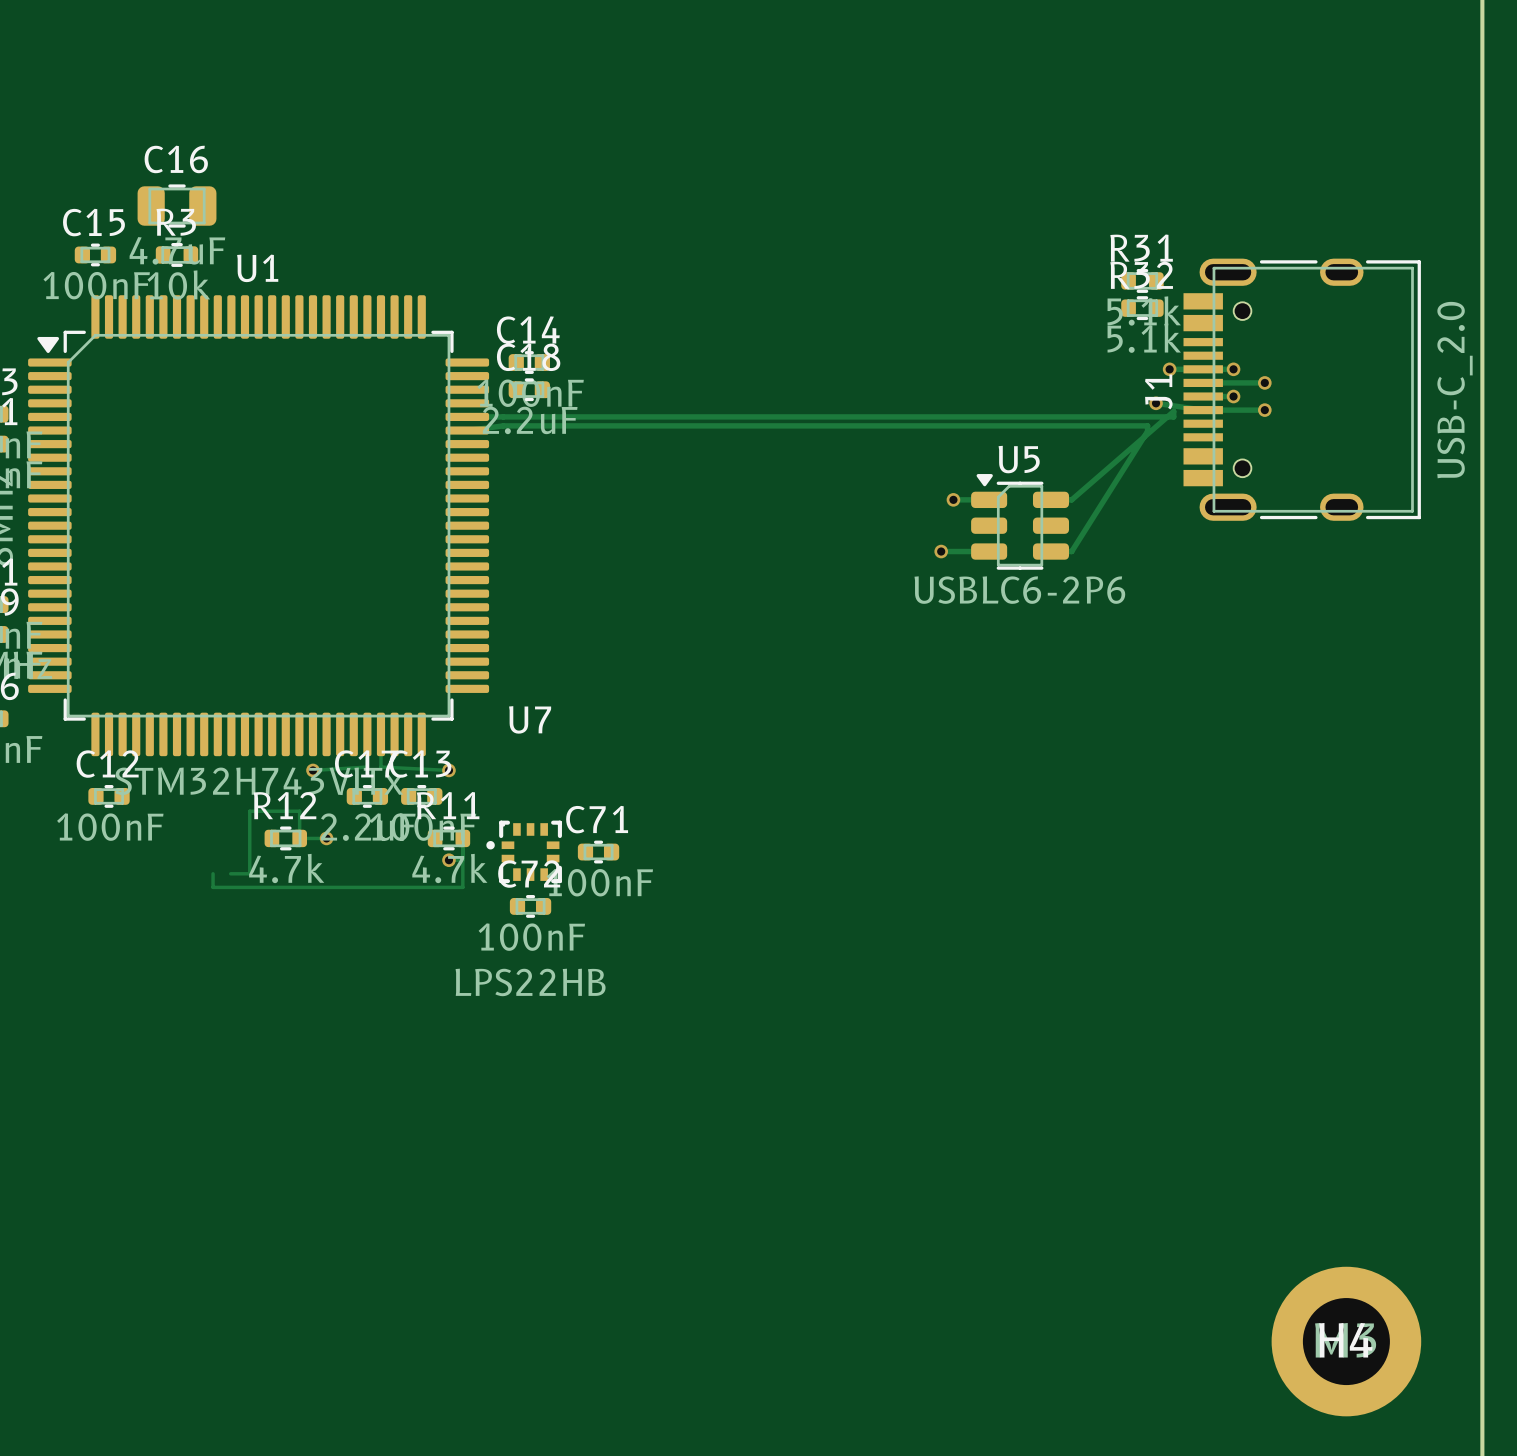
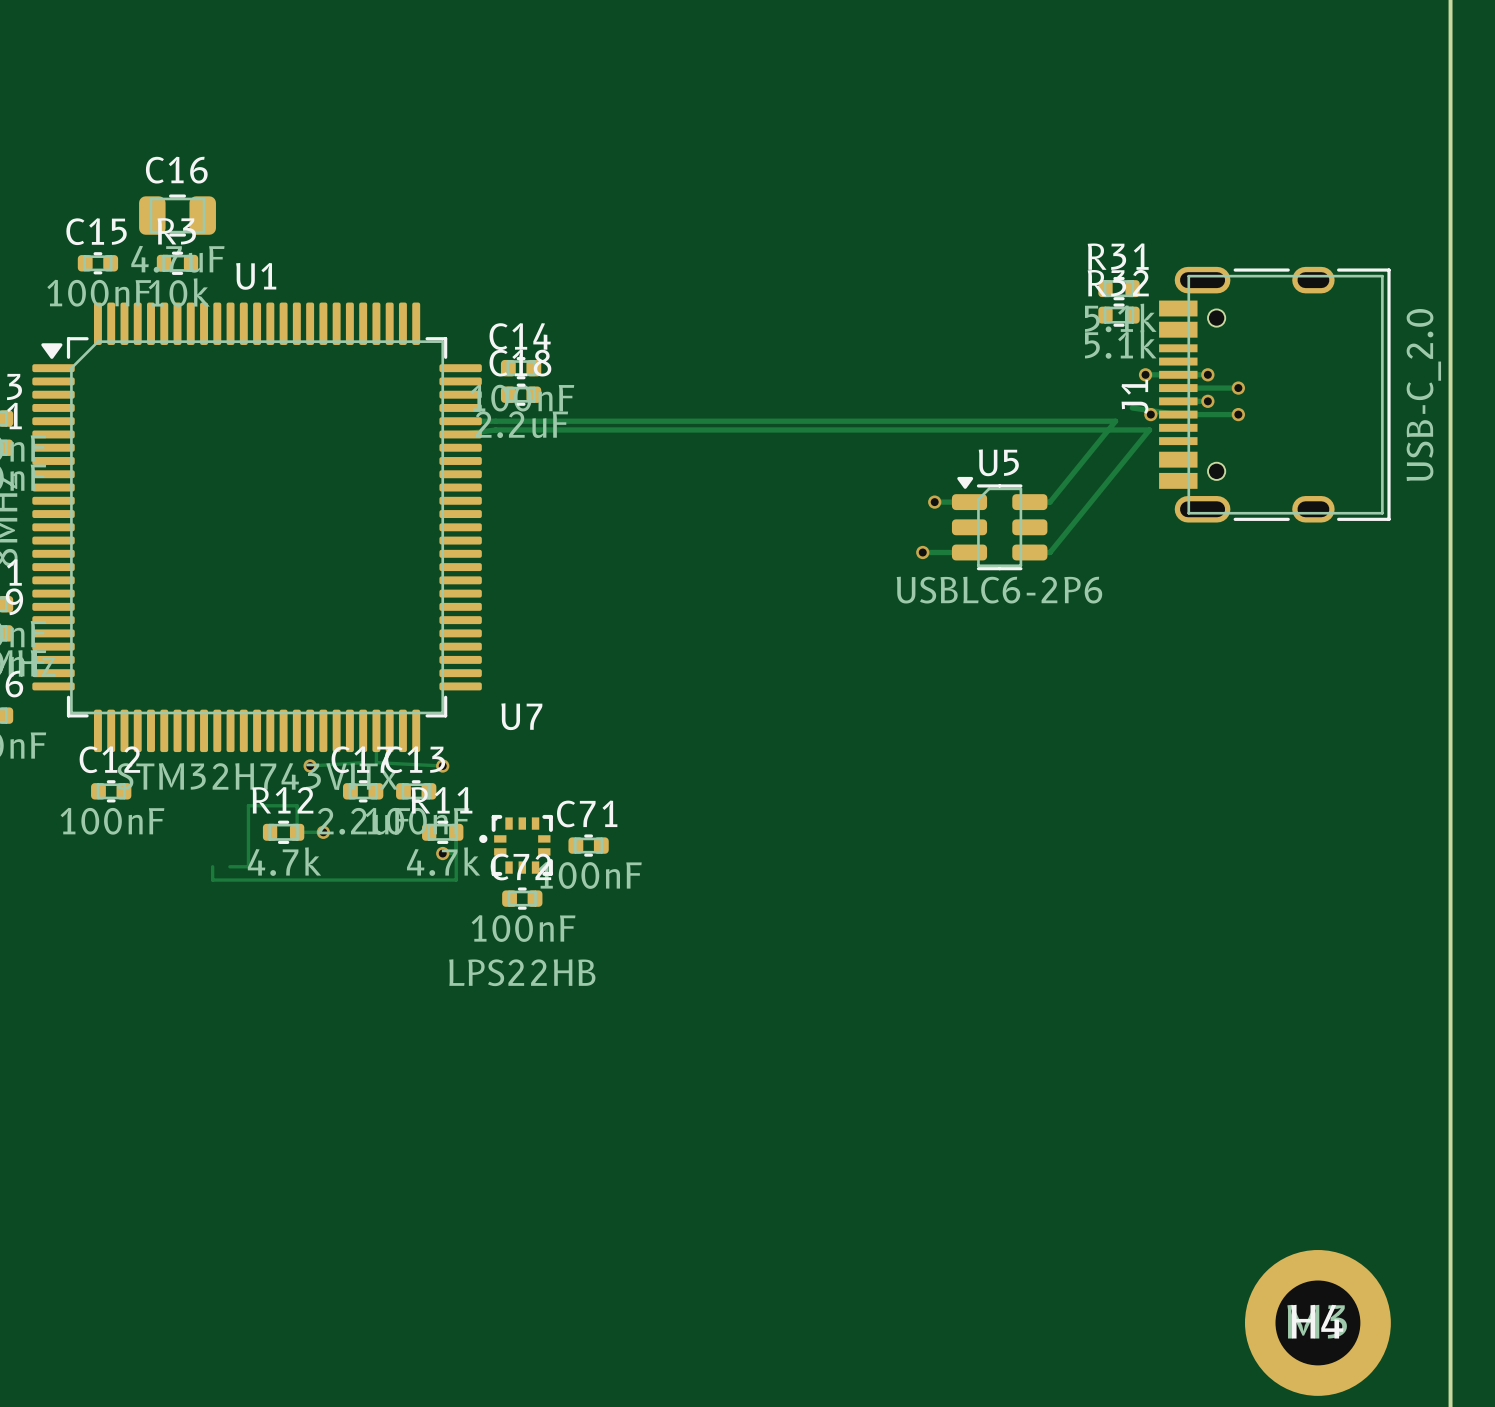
via position: (1156, 403) -> (1150, 414)
track: (1138, 416) (1173, 416) (1173, 411) (1071, 499) -> (1115, 421) (1050, 502)
track: (1147, 425) (1147, 431) (1071, 551) -> (1124, 429) (1149, 429) (1050, 552)

